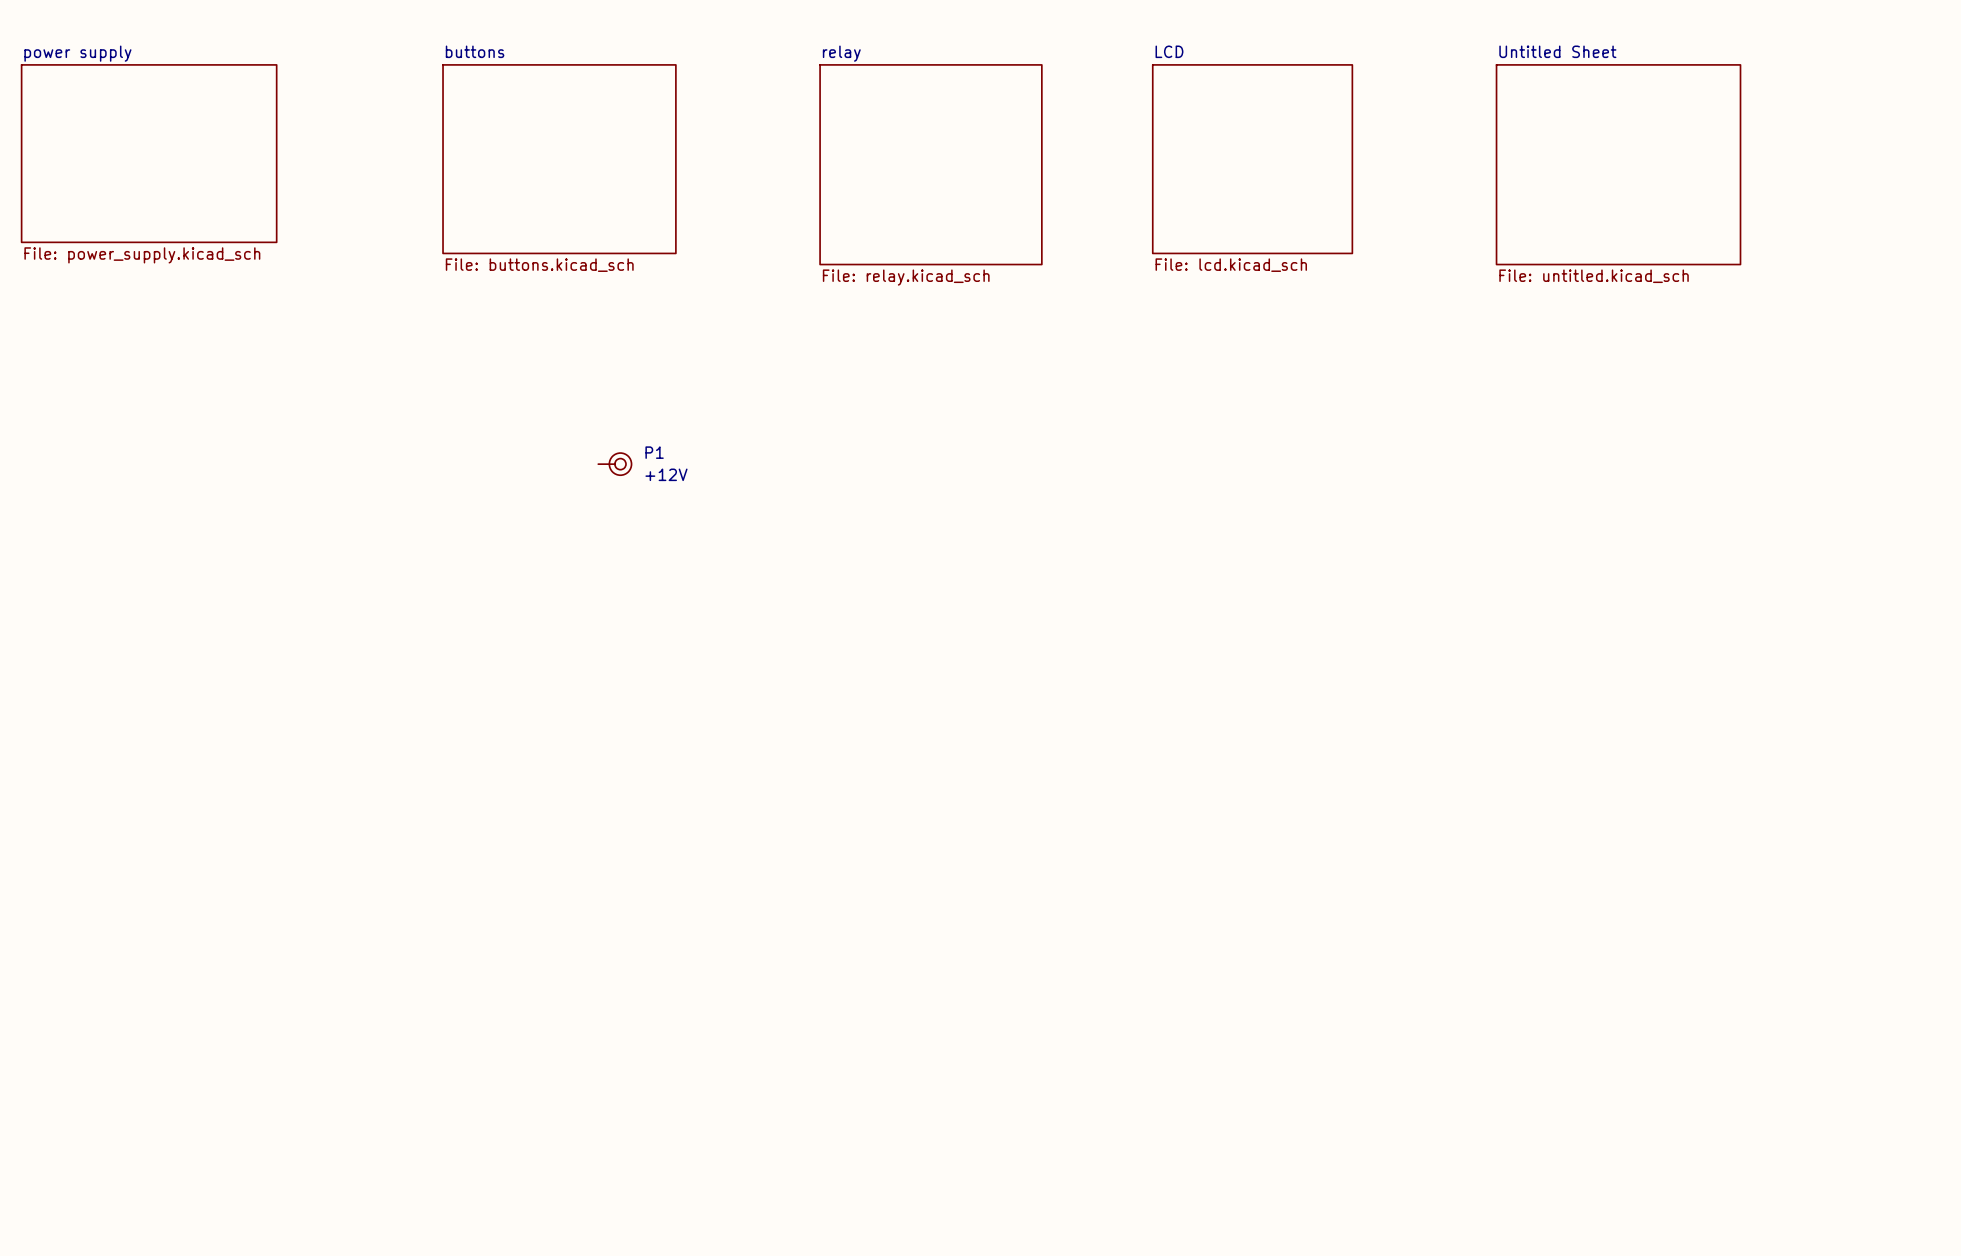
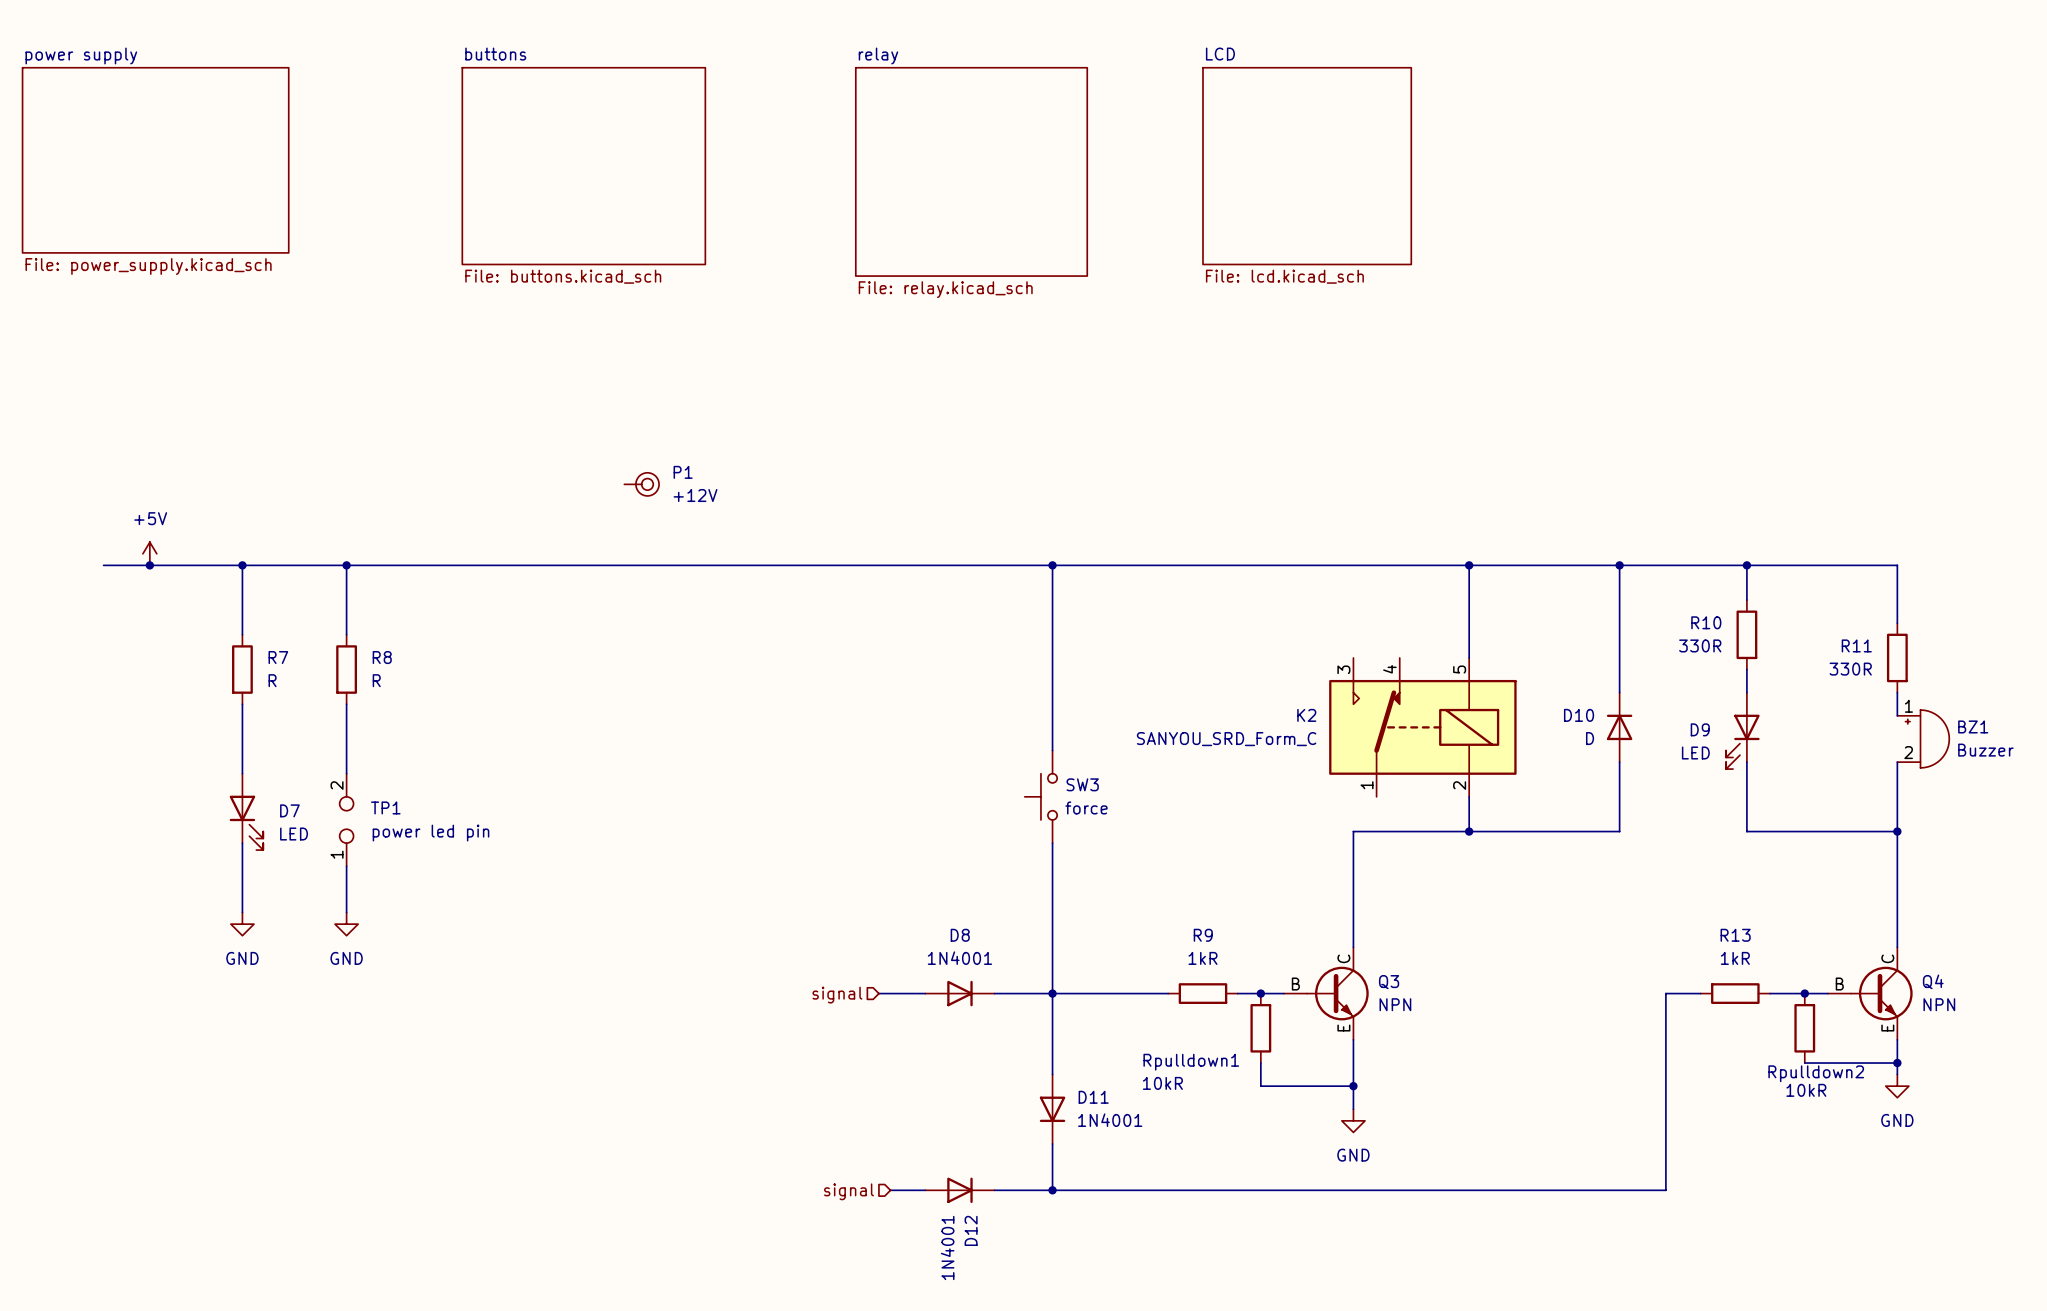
sheet Untitled Sheet: File: untitled.kicad_sch (1618, 164) -> none
power symbol: none -> +5V (149, 553)
wire: none -> (103, 565) (1897, 565) (1897, 623)
junction: none -> (149, 565)
wire: none -> (242, 565) (242, 634)
junction: none -> (242, 565)
wire: none -> (346, 565) (346, 634)
junction: none -> (346, 565)
wire: none -> (1052, 565) (1052, 750)
junction: none -> (1052, 565)
wire: none -> (1469, 565) (1469, 657)
junction: none -> (1469, 565)
wire: none -> (1619, 565) (1619, 692)
junction: none -> (1619, 565)
wire: none -> (1746, 565) (1746, 600)
junction: none -> (1746, 565)
R10: none -> 330R (1746, 634)
R11: none -> 330R (1897, 657)
R7: none -> R (242, 669)
R8: none -> R (346, 669)
wire: none -> (1746, 669) (1746, 692)
wire: none -> (1897, 692) (1897, 715)
wire: none -> (242, 704) (242, 773)
wire: none -> (346, 704) (346, 773)
K2: none -> SANYOU_SRD_Form_C (1422, 727)
D10: none -> D (1619, 727)
D9: none -> LED (1742, 730)
BZ1: none -> Buzzer (1923, 738)
wire: none -> (1619, 762) (1619, 831) (1353, 831) (1353, 947)
wire: none -> (1746, 762) (1746, 831) (1897, 831)
wire: none -> (1897, 762) (1897, 947)
SW3: none -> force (1040, 796)
wire: none -> (1469, 796) (1469, 831)
D7: none -> LED (246, 811)
TP1: none -> power led pin (346, 819)
junction: none -> (1469, 831)
junction: none -> (1897, 831)
wire: none -> (242, 843) (242, 912)
wire: none -> (1052, 843) (1052, 1074)
wire: none -> (346, 866) (346, 912)
power symbol: none -> GND (242, 924)
power symbol: none -> GND (346, 924)
wire: none -> (878, 993) (925, 993)
D8: none -> 1N4001 (959, 993)
wire: none -> (994, 993) (1168, 993)
junction: none -> (1052, 993)
R9: none -> 1kR (1202, 993)
wire: none -> (1237, 993) (1283, 993)
junction: none -> (1260, 993)
Q3: none -> NPN (1326, 993)
wire: none -> (1700, 993) (1665, 993) (1665, 1190) (994, 1190)
R13: none -> 1kR (1735, 993)
wire: none -> (1770, 993) (1827, 993)
junction: none -> (1804, 993)
Q4: none -> NPN (1870, 993)
hierarchical label: none -> signal (837, 995)
Rpulldown1: none -> 10kR (1260, 1028)
Rpulldown2: none -> 10kR (1804, 1028)
wire: none -> (1353, 1039) (1353, 1109)
wire: none -> (1897, 1039) (1897, 1074)
wire: none -> (1260, 1063) (1260, 1086) (1353, 1086)
wire: none -> (1804, 1063) (1897, 1063)
junction: none -> (1897, 1063)
junction: none -> (1353, 1086)
power symbol: none -> GND (1897, 1086)
D11: none -> 1N4001 (1052, 1109)
power symbol: none -> GND (1353, 1120)
wire: none -> (1052, 1144) (1052, 1190)
wire: none -> (890, 1190) (925, 1190)
D12: none -> 1N4001 (959, 1190)
junction: none -> (1052, 1190)
hierarchical label: none -> signal (849, 1191)

